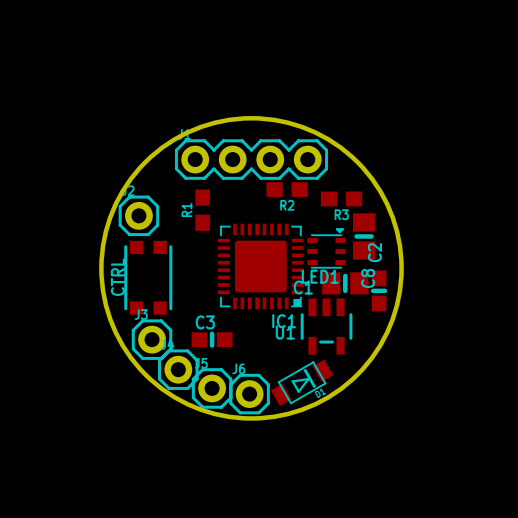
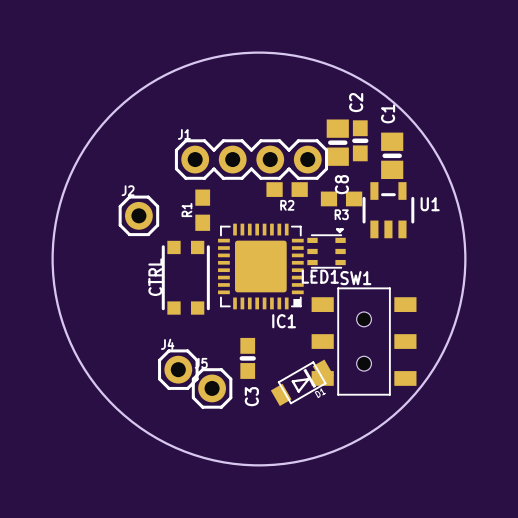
round board edge size: [99, 116, 404, 421] -> [51, 51, 467, 467]
C8 position: (364, 236) -> (337, 142)
CTRL position: (148, 277) -> (185, 277)
C1 rotation: 0° (345, 283) -> 90° clockwise (392, 155)
C1 position: (345, 283) -> (392, 155)
C2 position: (379, 290) -> (360, 140)
C3 name position: C3 (205, 322) -> C3 (251, 396)
U1 rotation: 0° (326, 326) -> 180° (388, 210)
U1 position: (326, 326) -> (388, 210)
J3: (152, 339) -> none
C3 rotation: 0° (212, 339) -> 90° clockwise (247, 358)
C3 position: (212, 339) -> (247, 358)
SW1: none -> (364, 341)
J6: (249, 394) -> none

